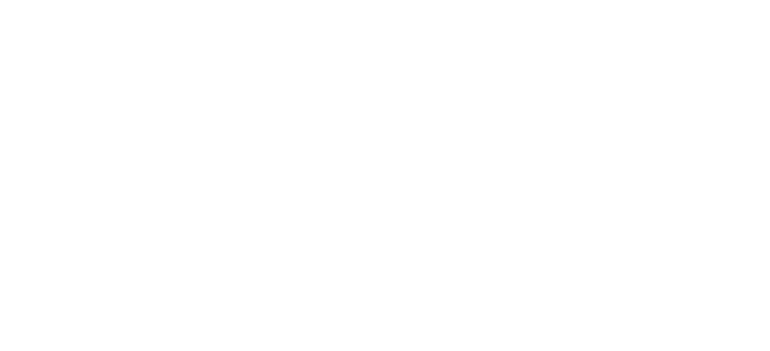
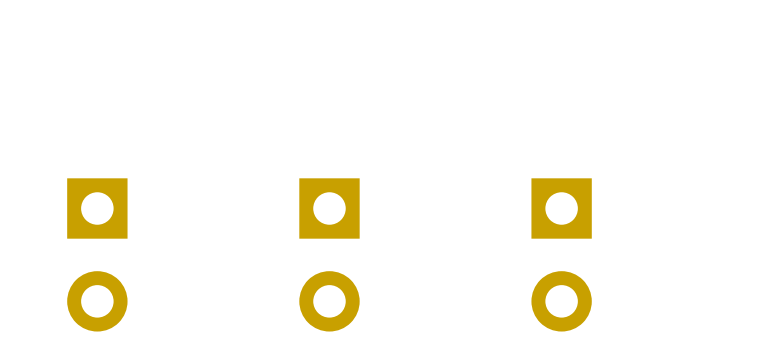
part: none -> (97, 254)
part: none -> (329, 254)
part: none -> (561, 254)

